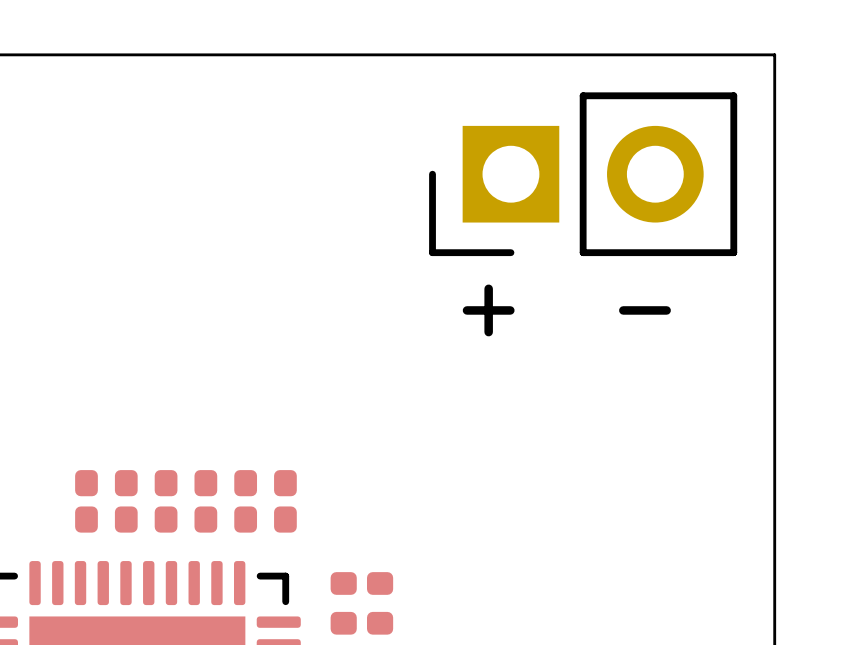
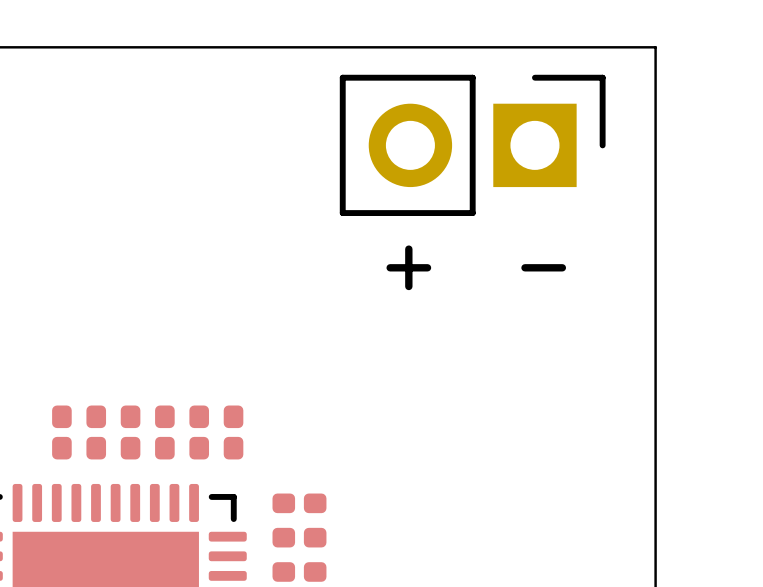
part rotation: 0° (583, 174) -> 180° (472, 145)

